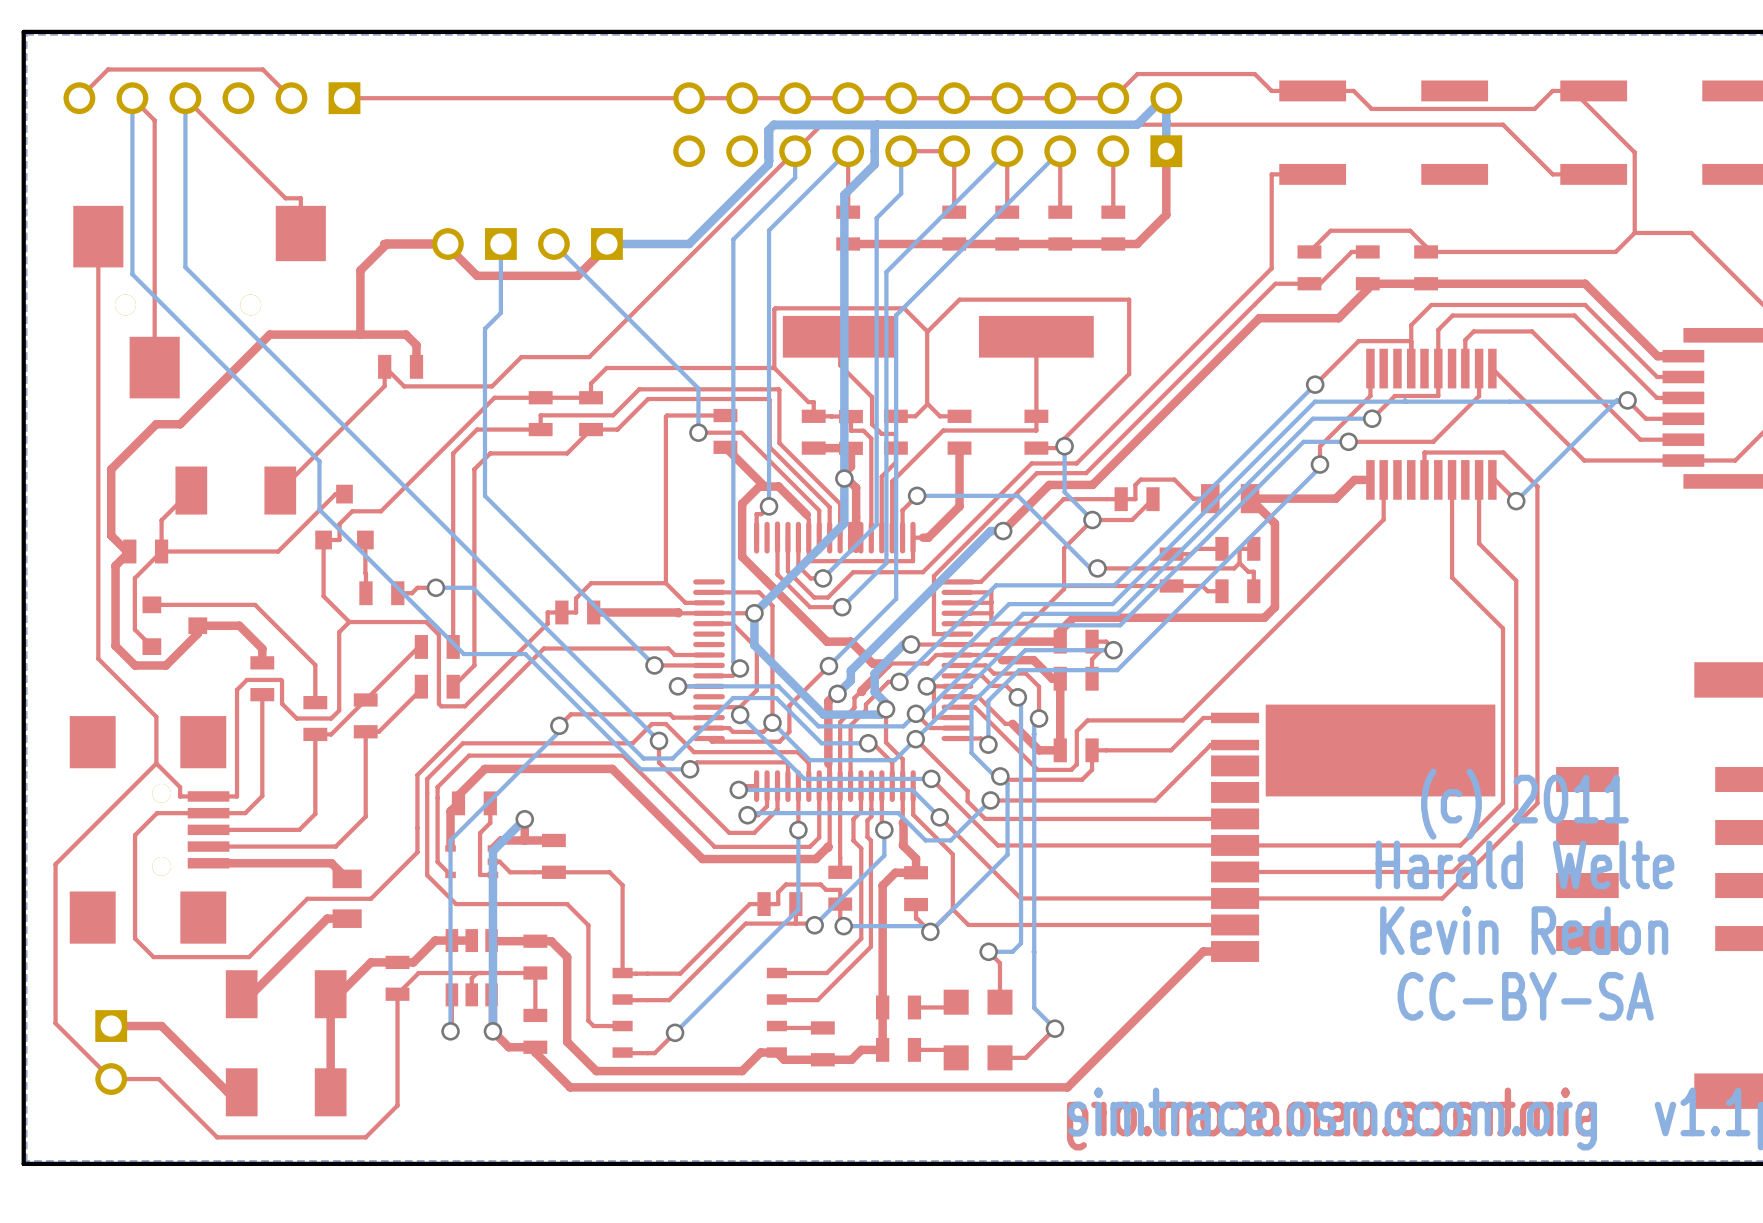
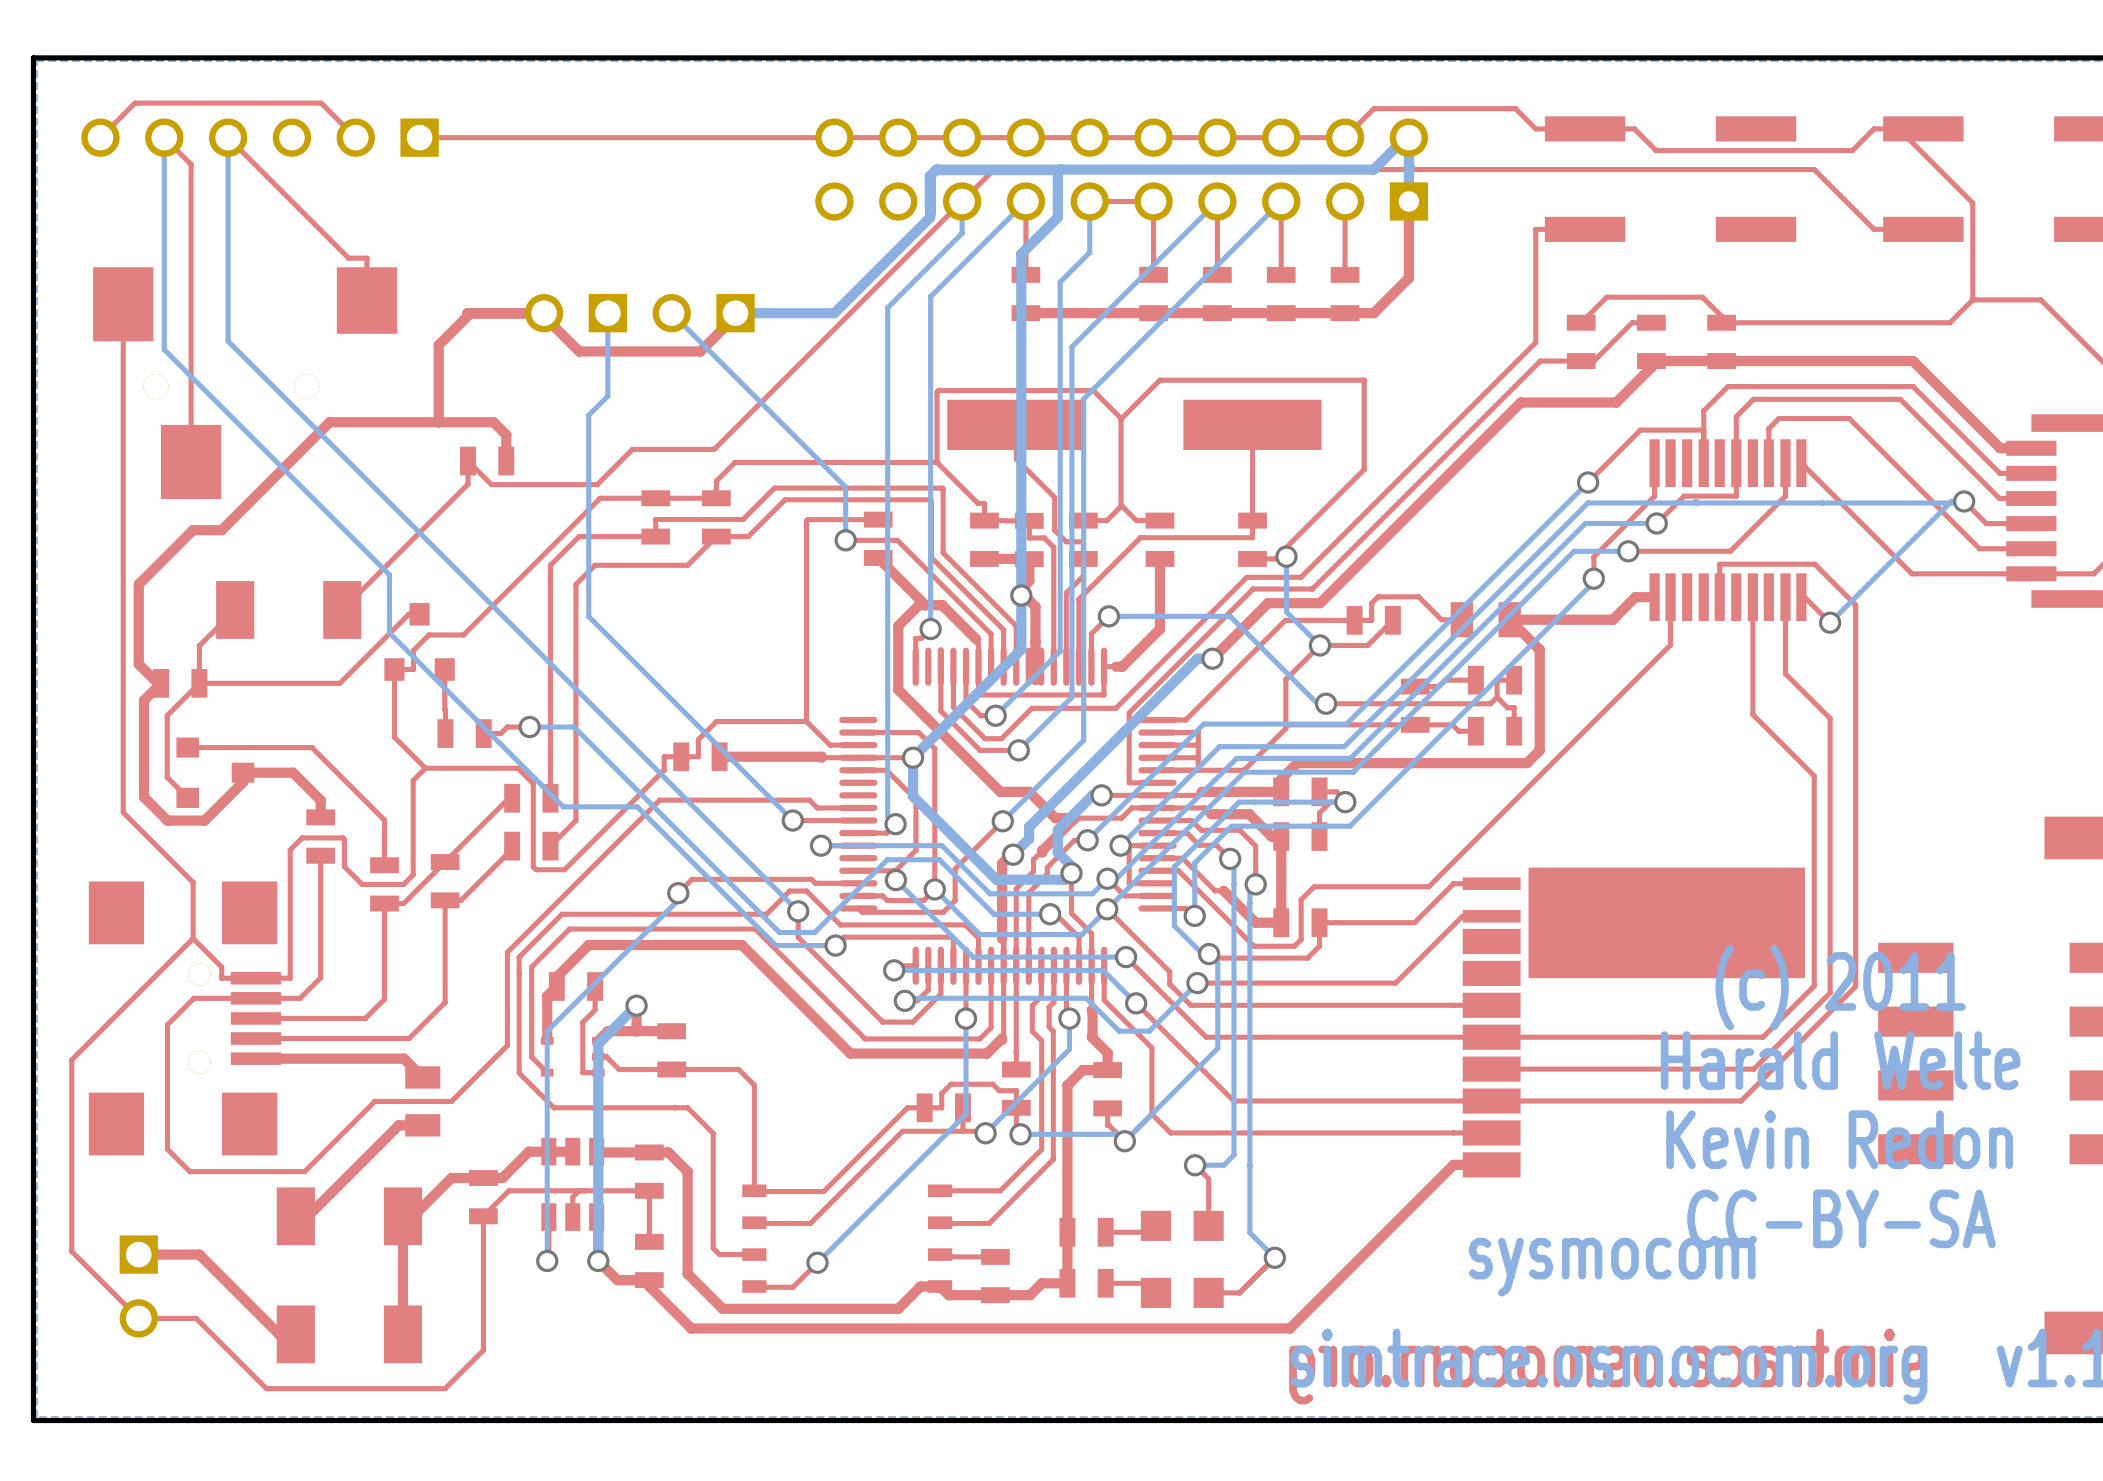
text: none -> sysmocom (1612, 1267)

